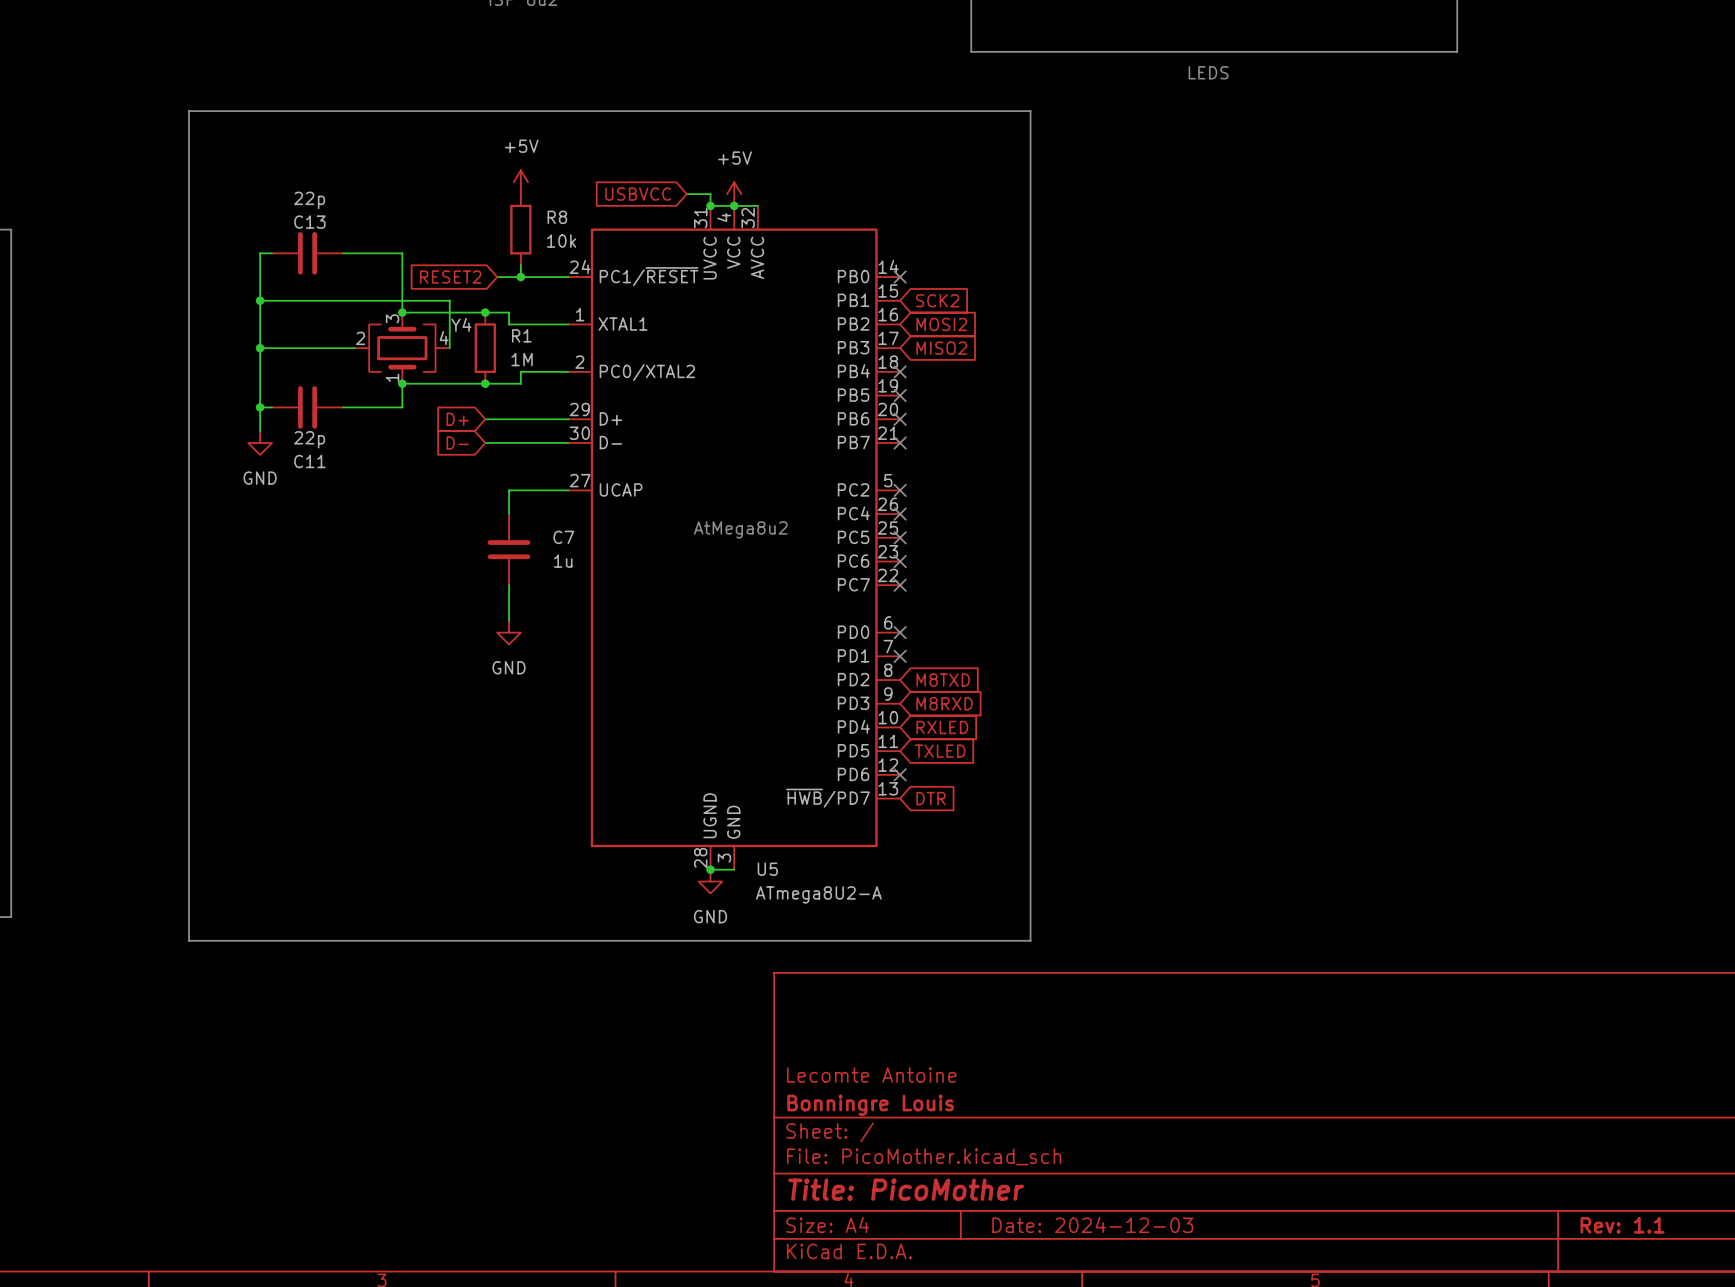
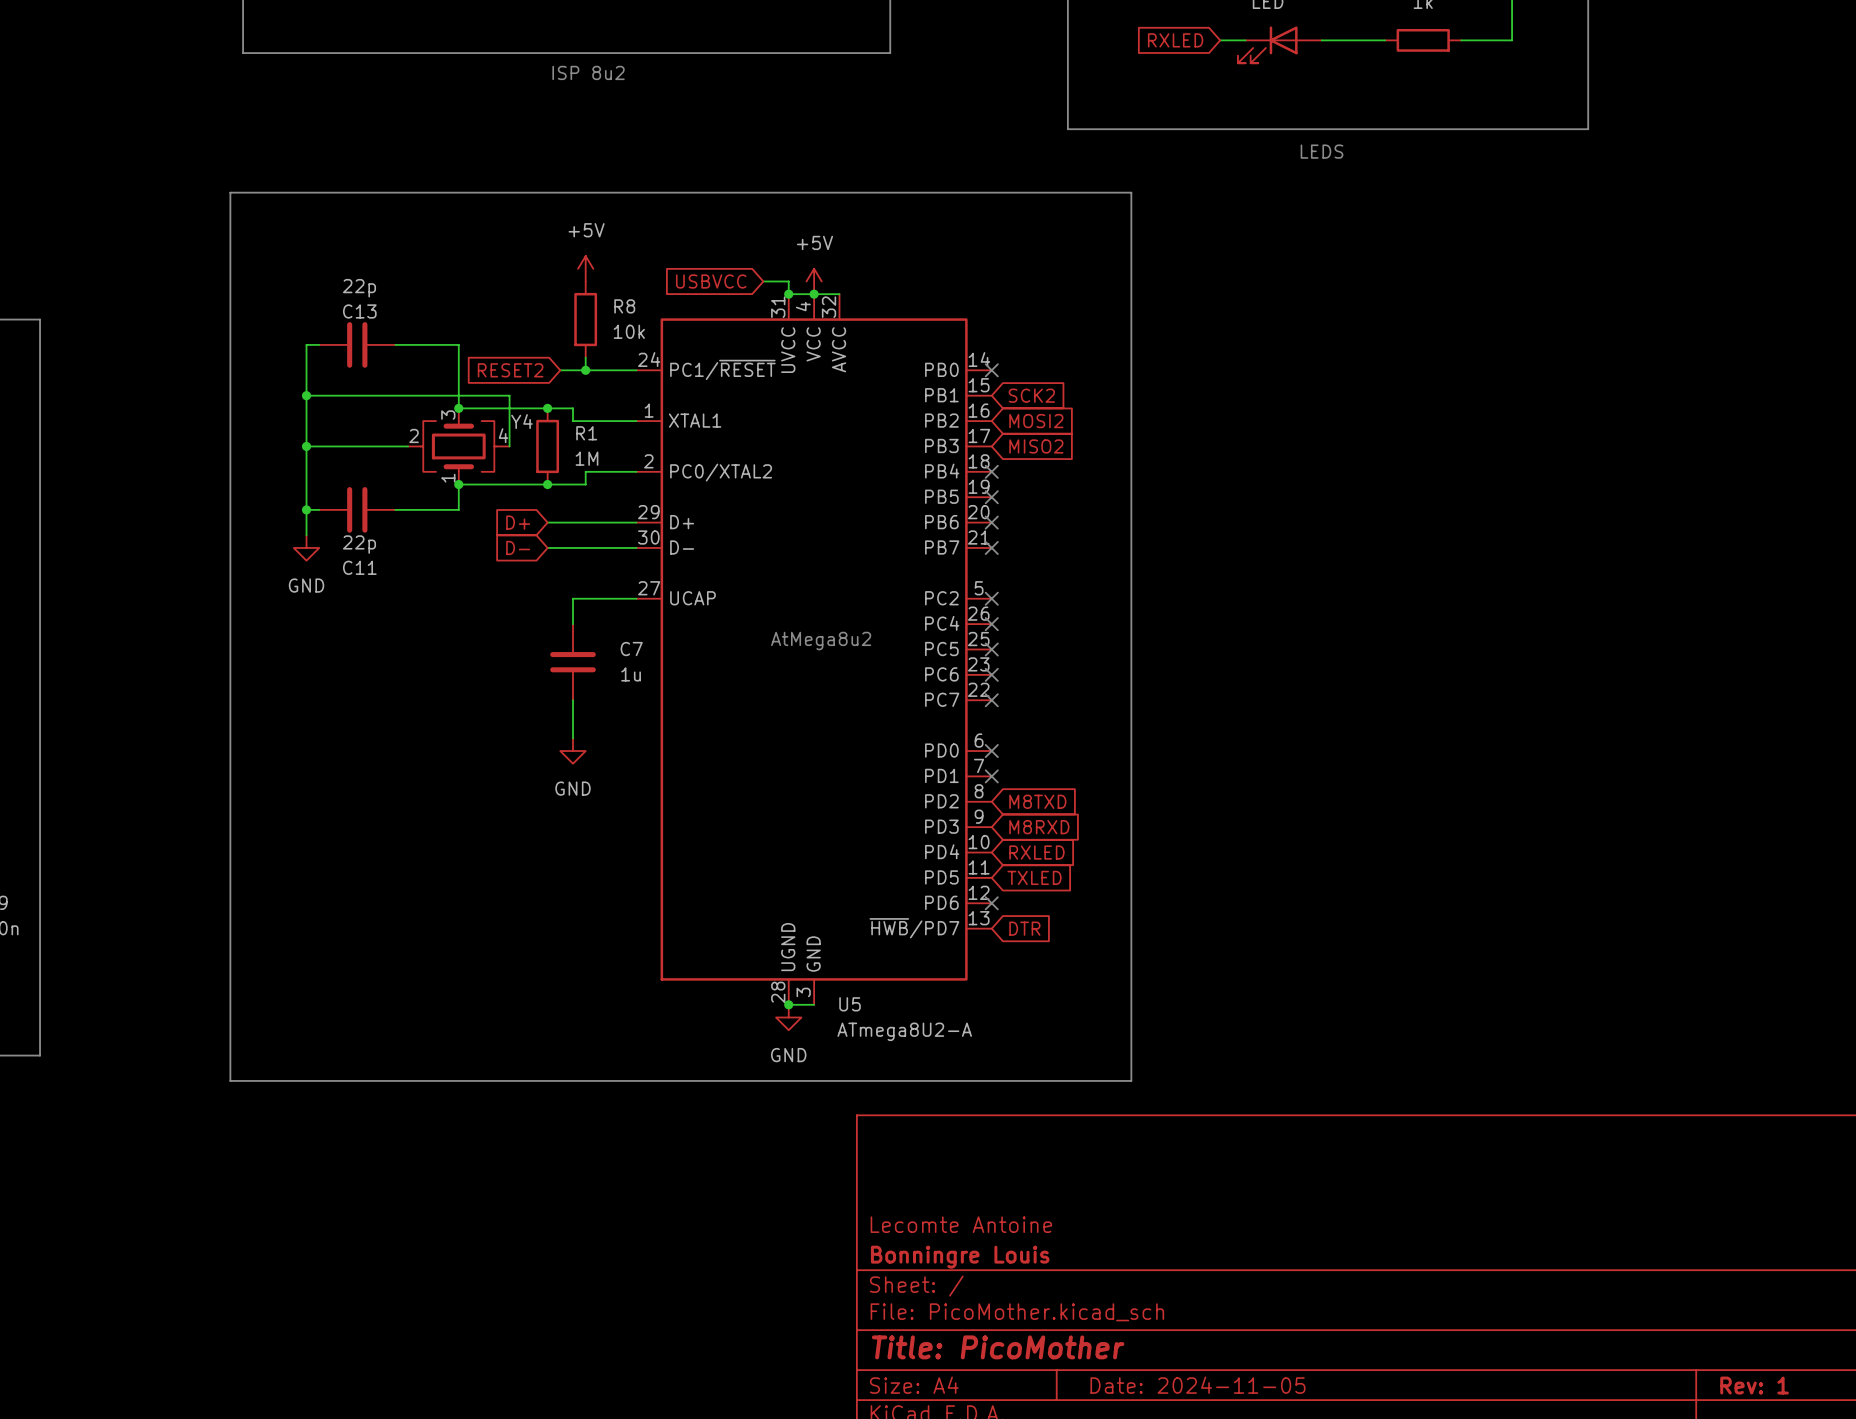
title block: Date: 2024-12-03 (1092, 1224) -> Date: 2024-11-05 (1197, 1385)
title block: Rev: 1.1 (1622, 1225) -> Rev: 1 (1754, 1385)

